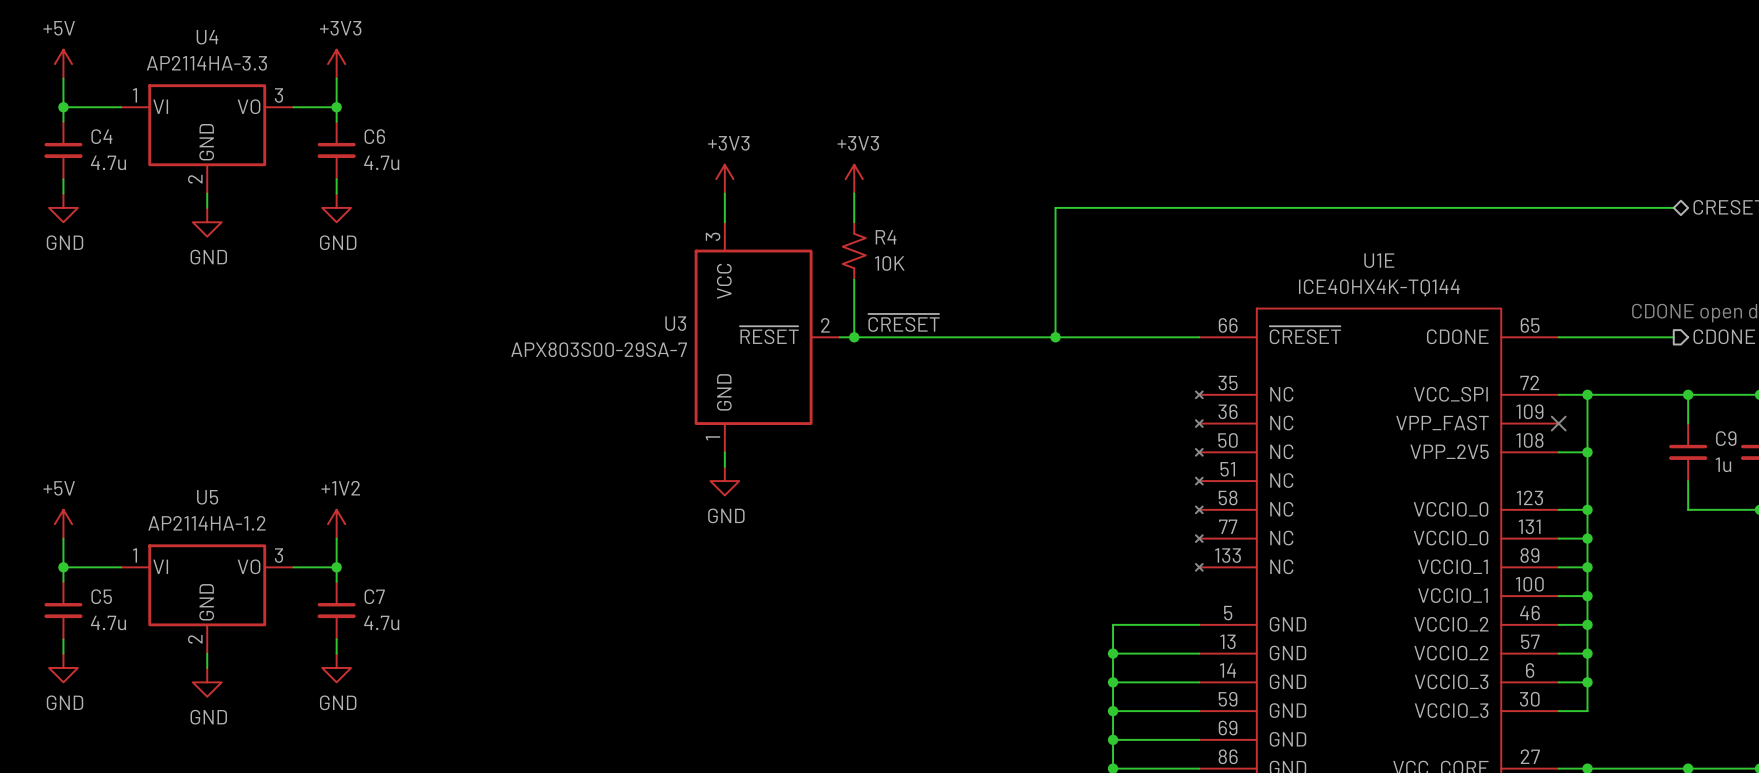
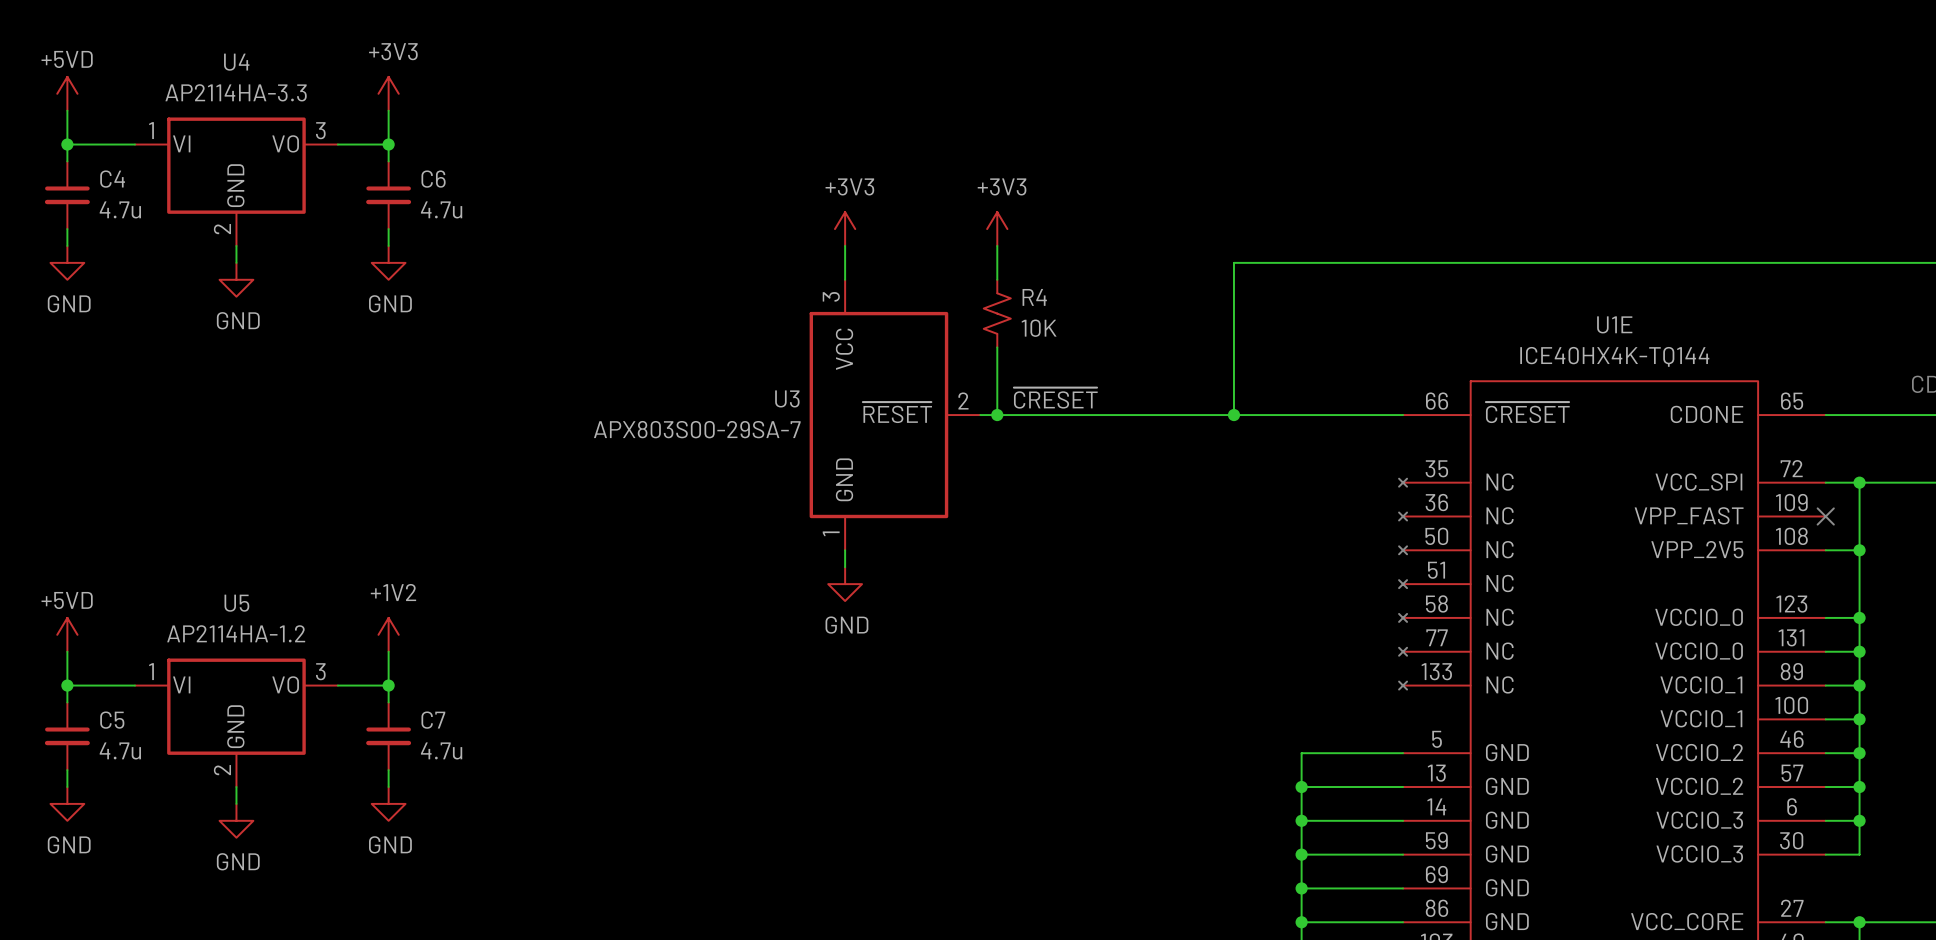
power symbol: +5V (63, 64) -> +5VD (67, 93)
power symbol: +5V (63, 524) -> +5VD (67, 634)

